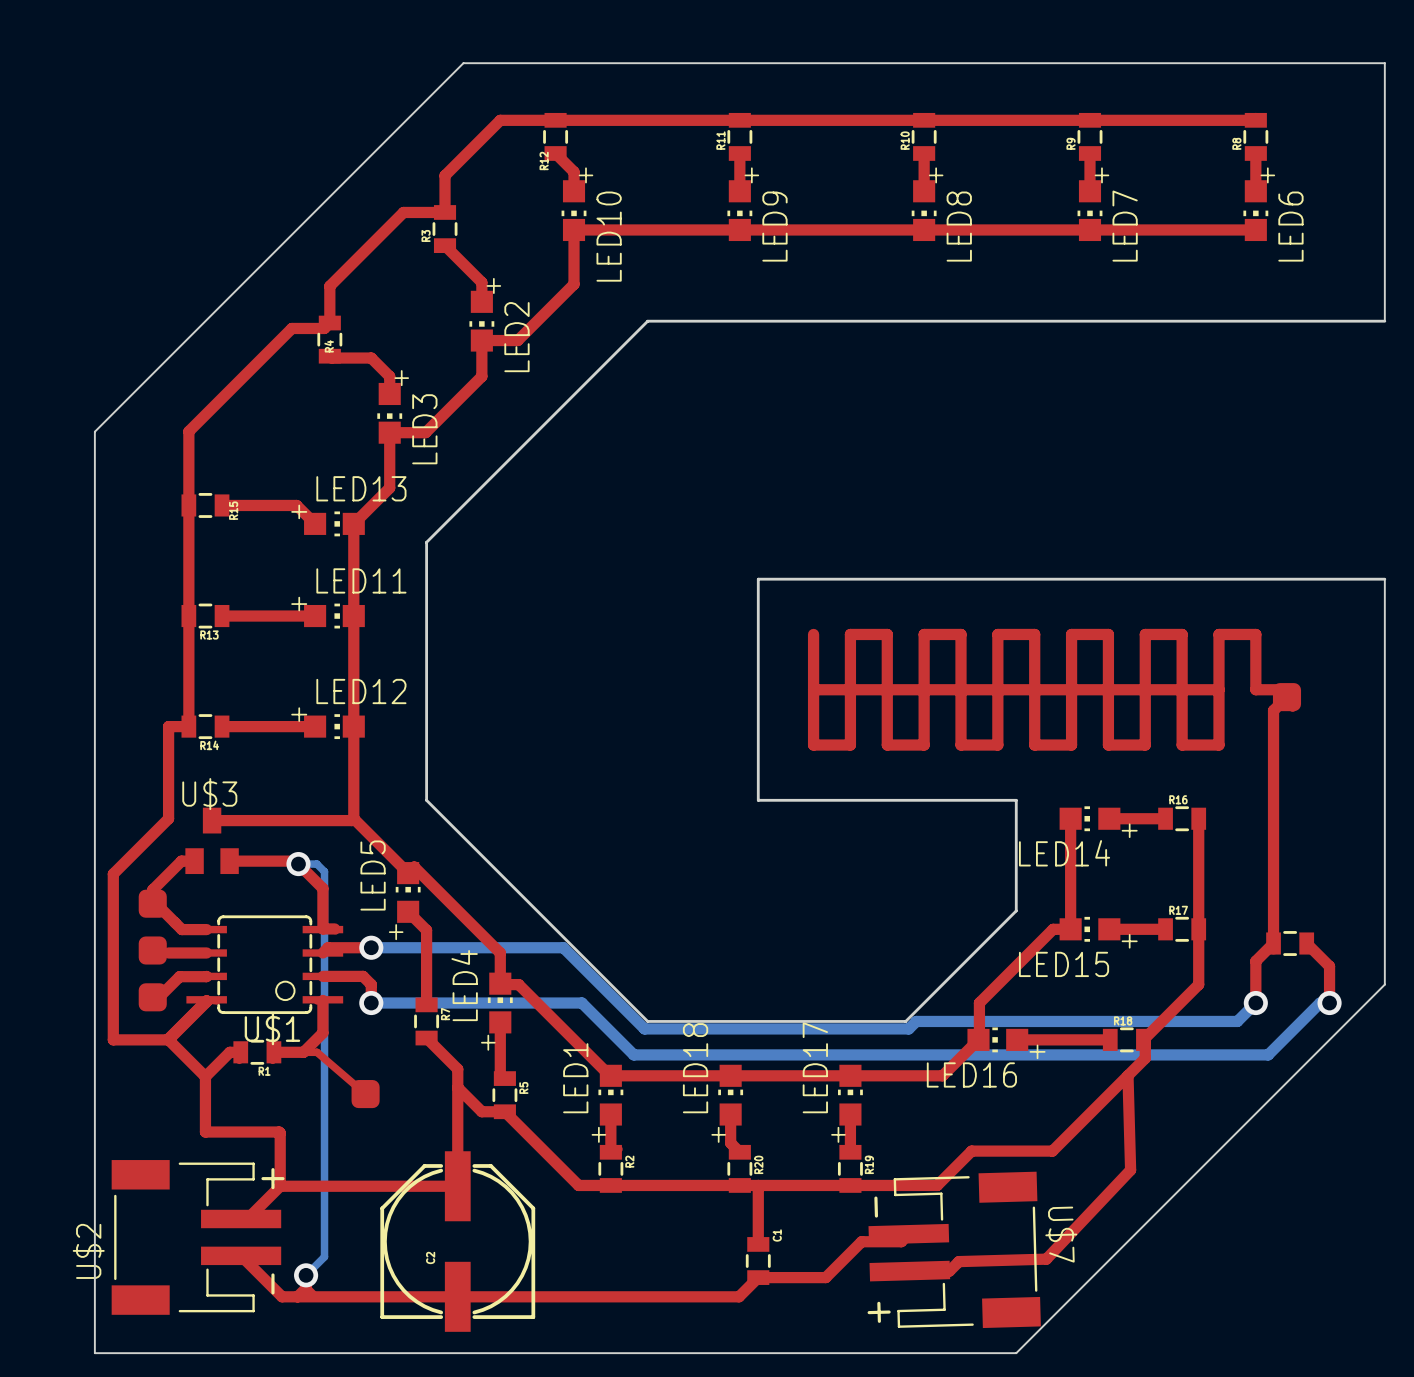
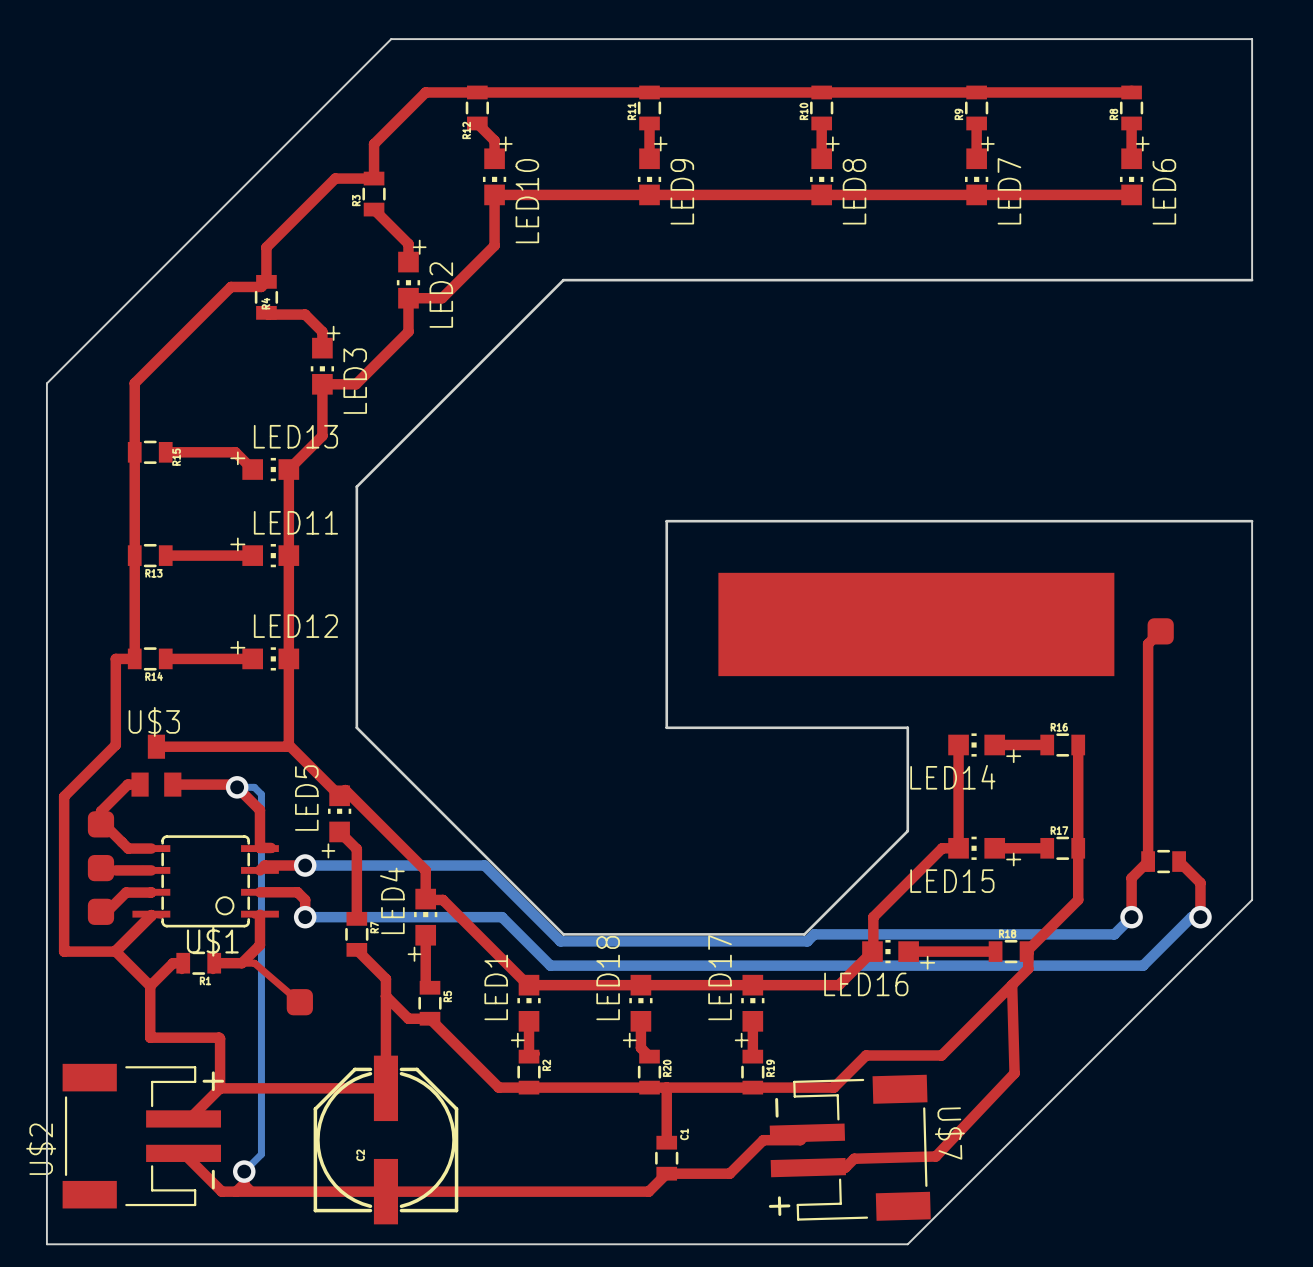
top track: (813, 634) (813, 745) (850, 745) (850, 634) (887, 634) (887, 745) (924, 745) (924, 634) (961, 634) (961, 745) (997, 745) (997, 634) (1034, 634) (1034, 745) (1071, 745) (1071, 634) (1108, 634) (1108, 745) (1145, 745) (1145, 634) (1182, 634) (1182, 745) (1218, 745) (1218, 634) (1255, 634) (1255, 689) (1292, 689) (1292, 708) -> none
drawing: none -> [718, 572, 1115, 677]
top track: (813, 689) (1218, 689) -> none

